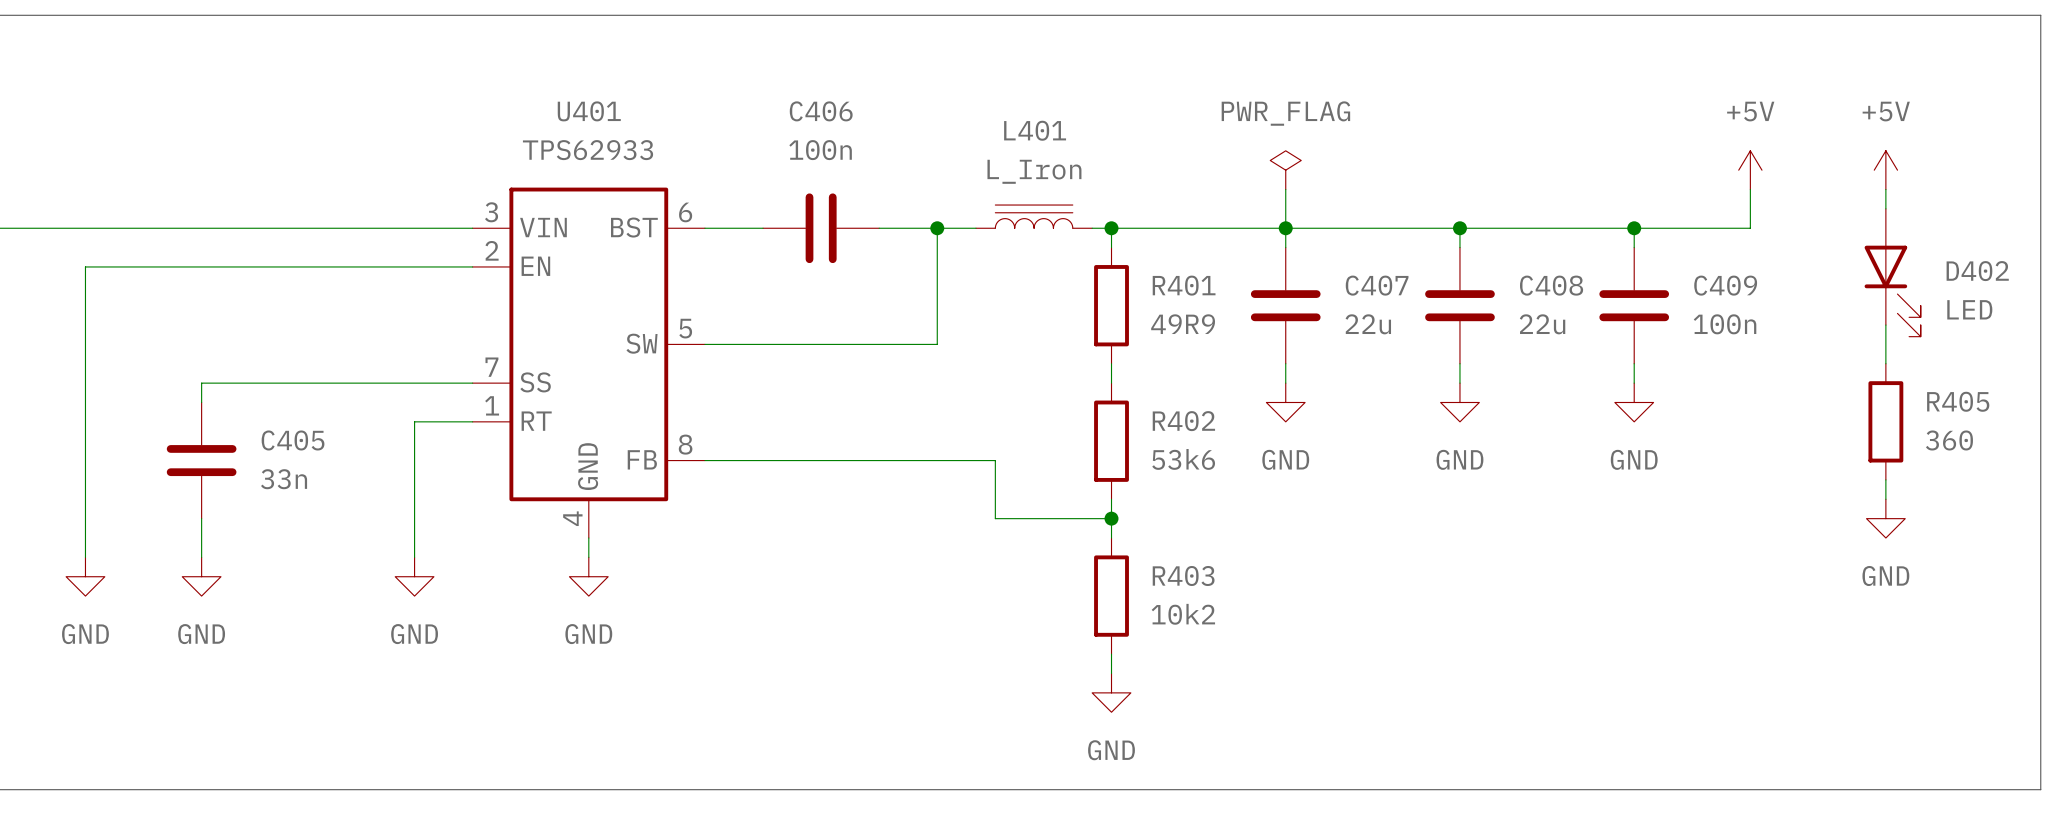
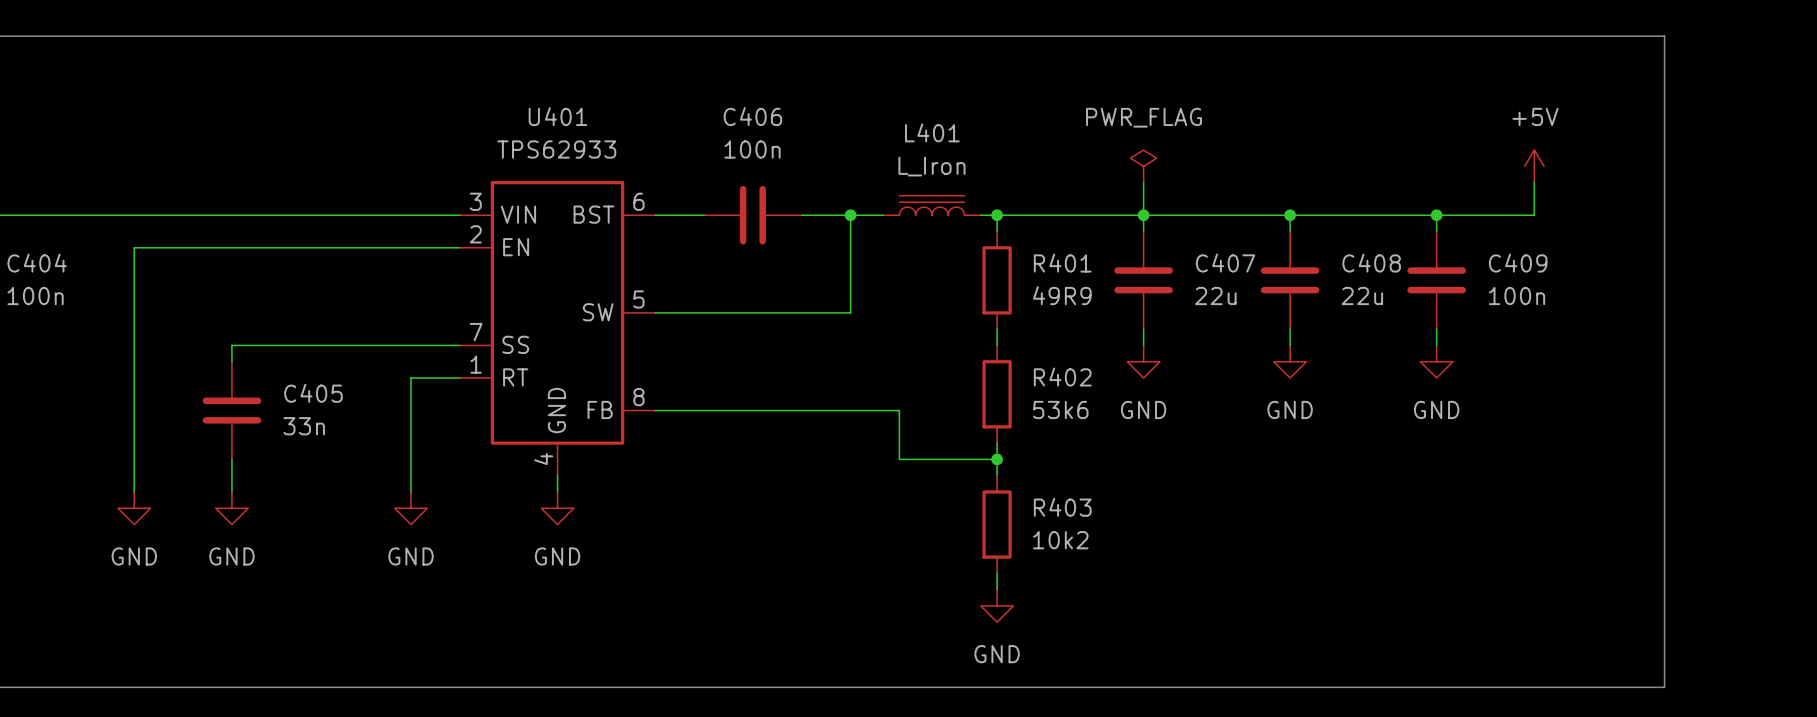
line: (1905, 15) (2040, 15) (2040, 789) (1905, 789) -> (1664, 36) (1664, 687)
power symbol: +5V (1885, 170) -> none
wire: (1885, 189) (1885, 208) -> none
D402: LED (1892, 272) -> none
wire: (1885, 325) (1885, 363) -> none
R405: 360 (1885, 421) -> none
wire: (1885, 479) (1885, 499) -> none
power symbol: GND (1885, 518) -> none

